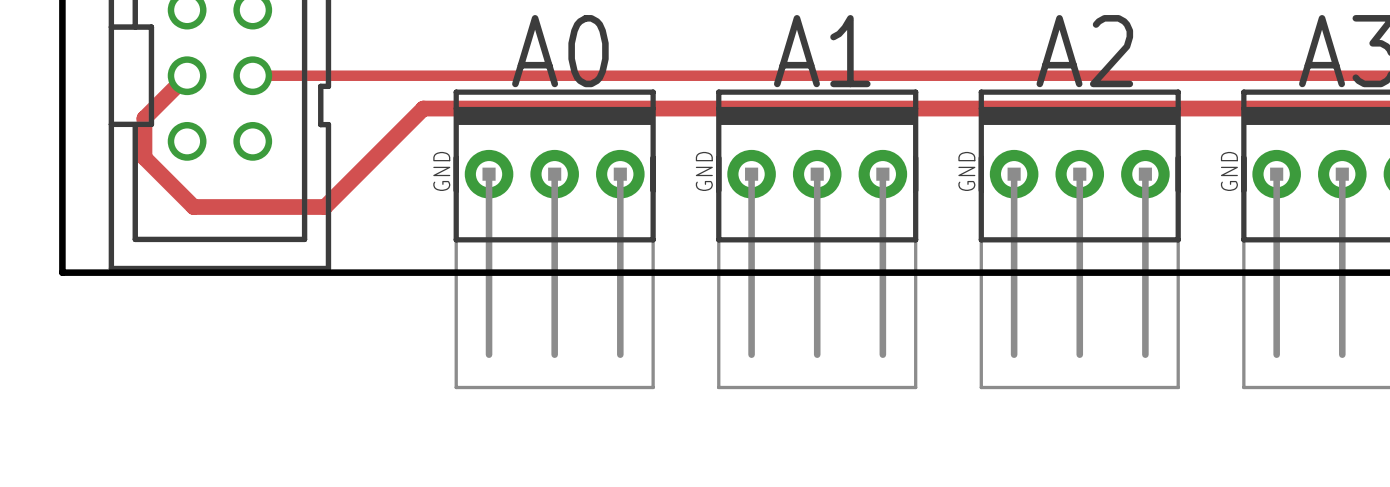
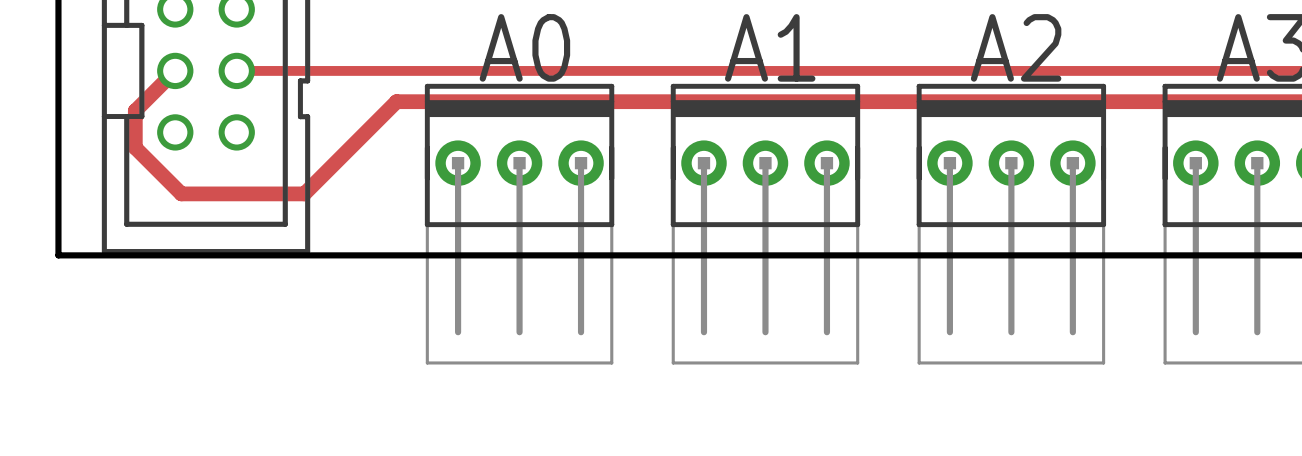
text: GND (441, 171) -> none
text: GND (704, 171) -> none
text: GND (966, 171) -> none
text: GND (1229, 171) -> none

